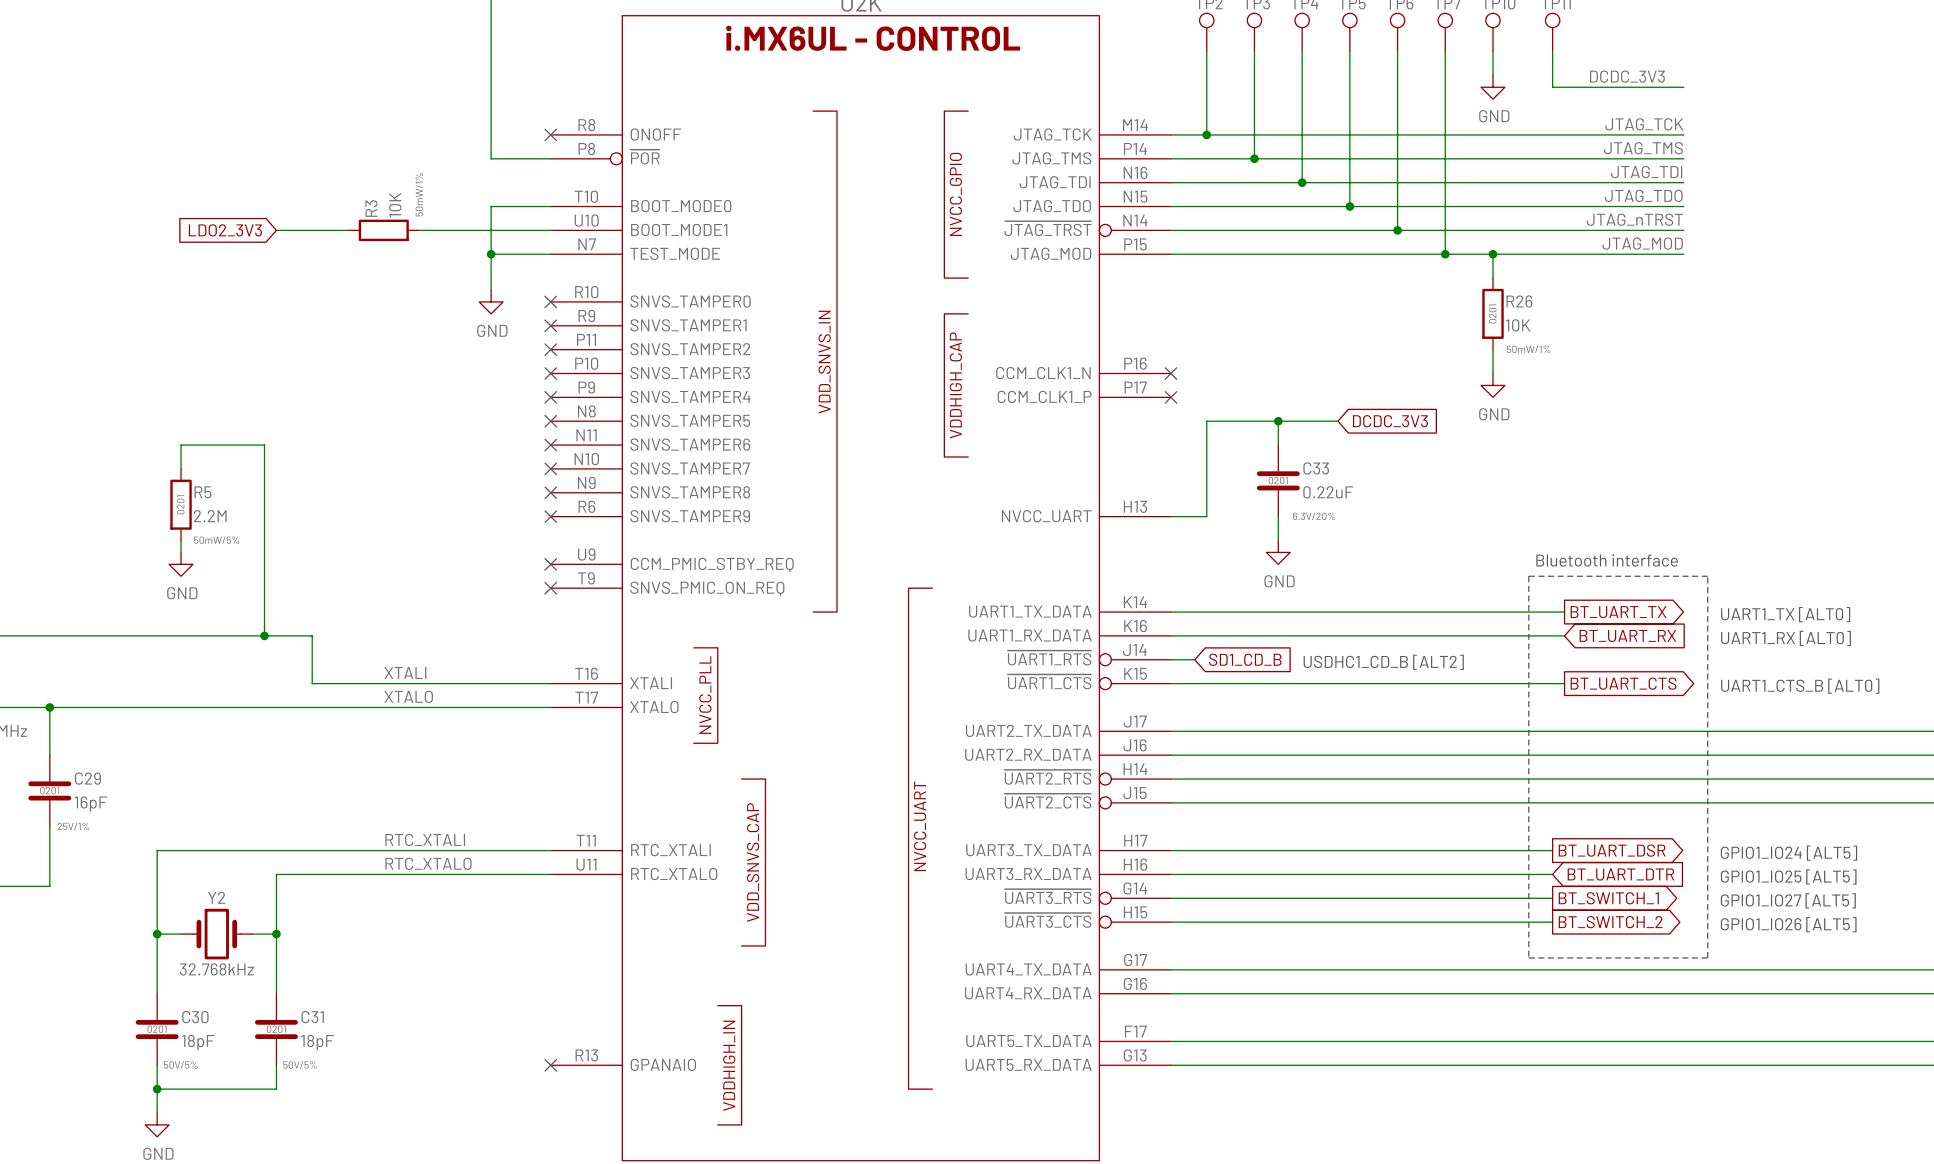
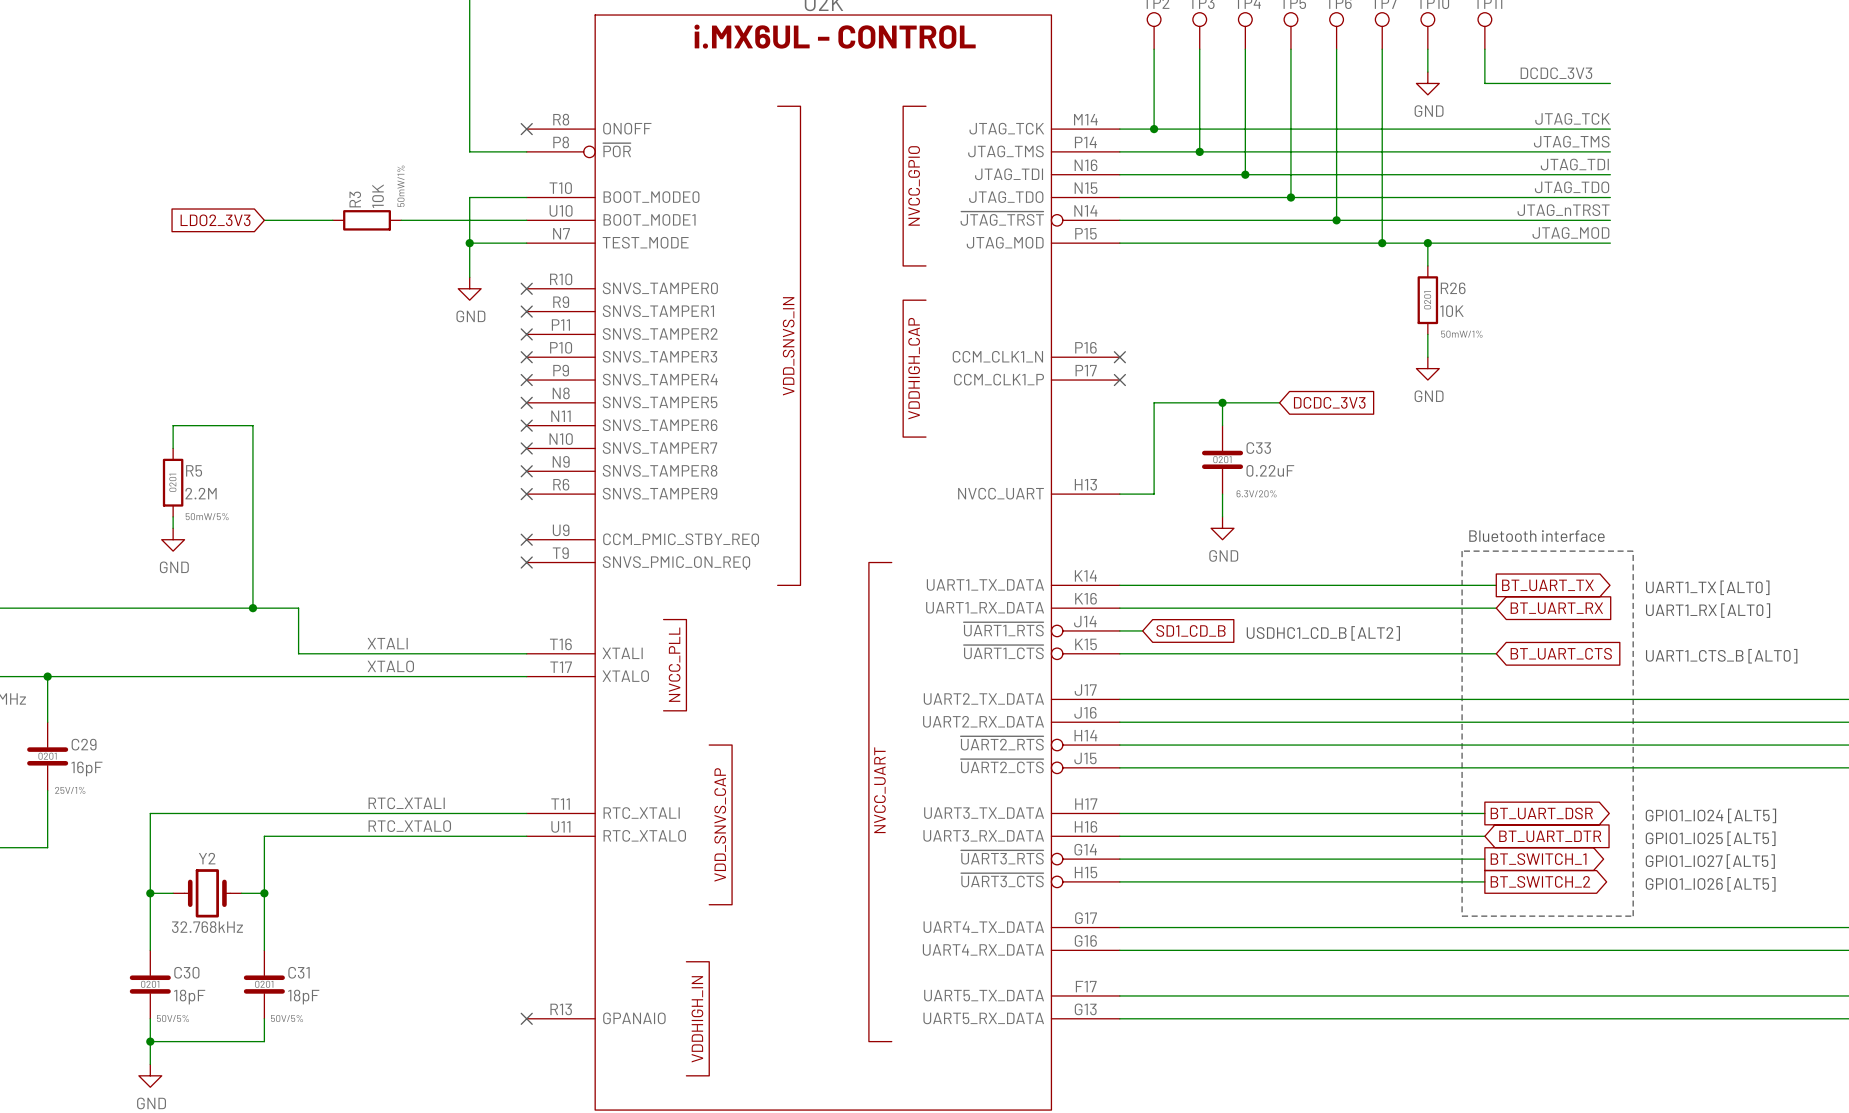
global label shape: output (1623, 683) -> input (1561, 653)

